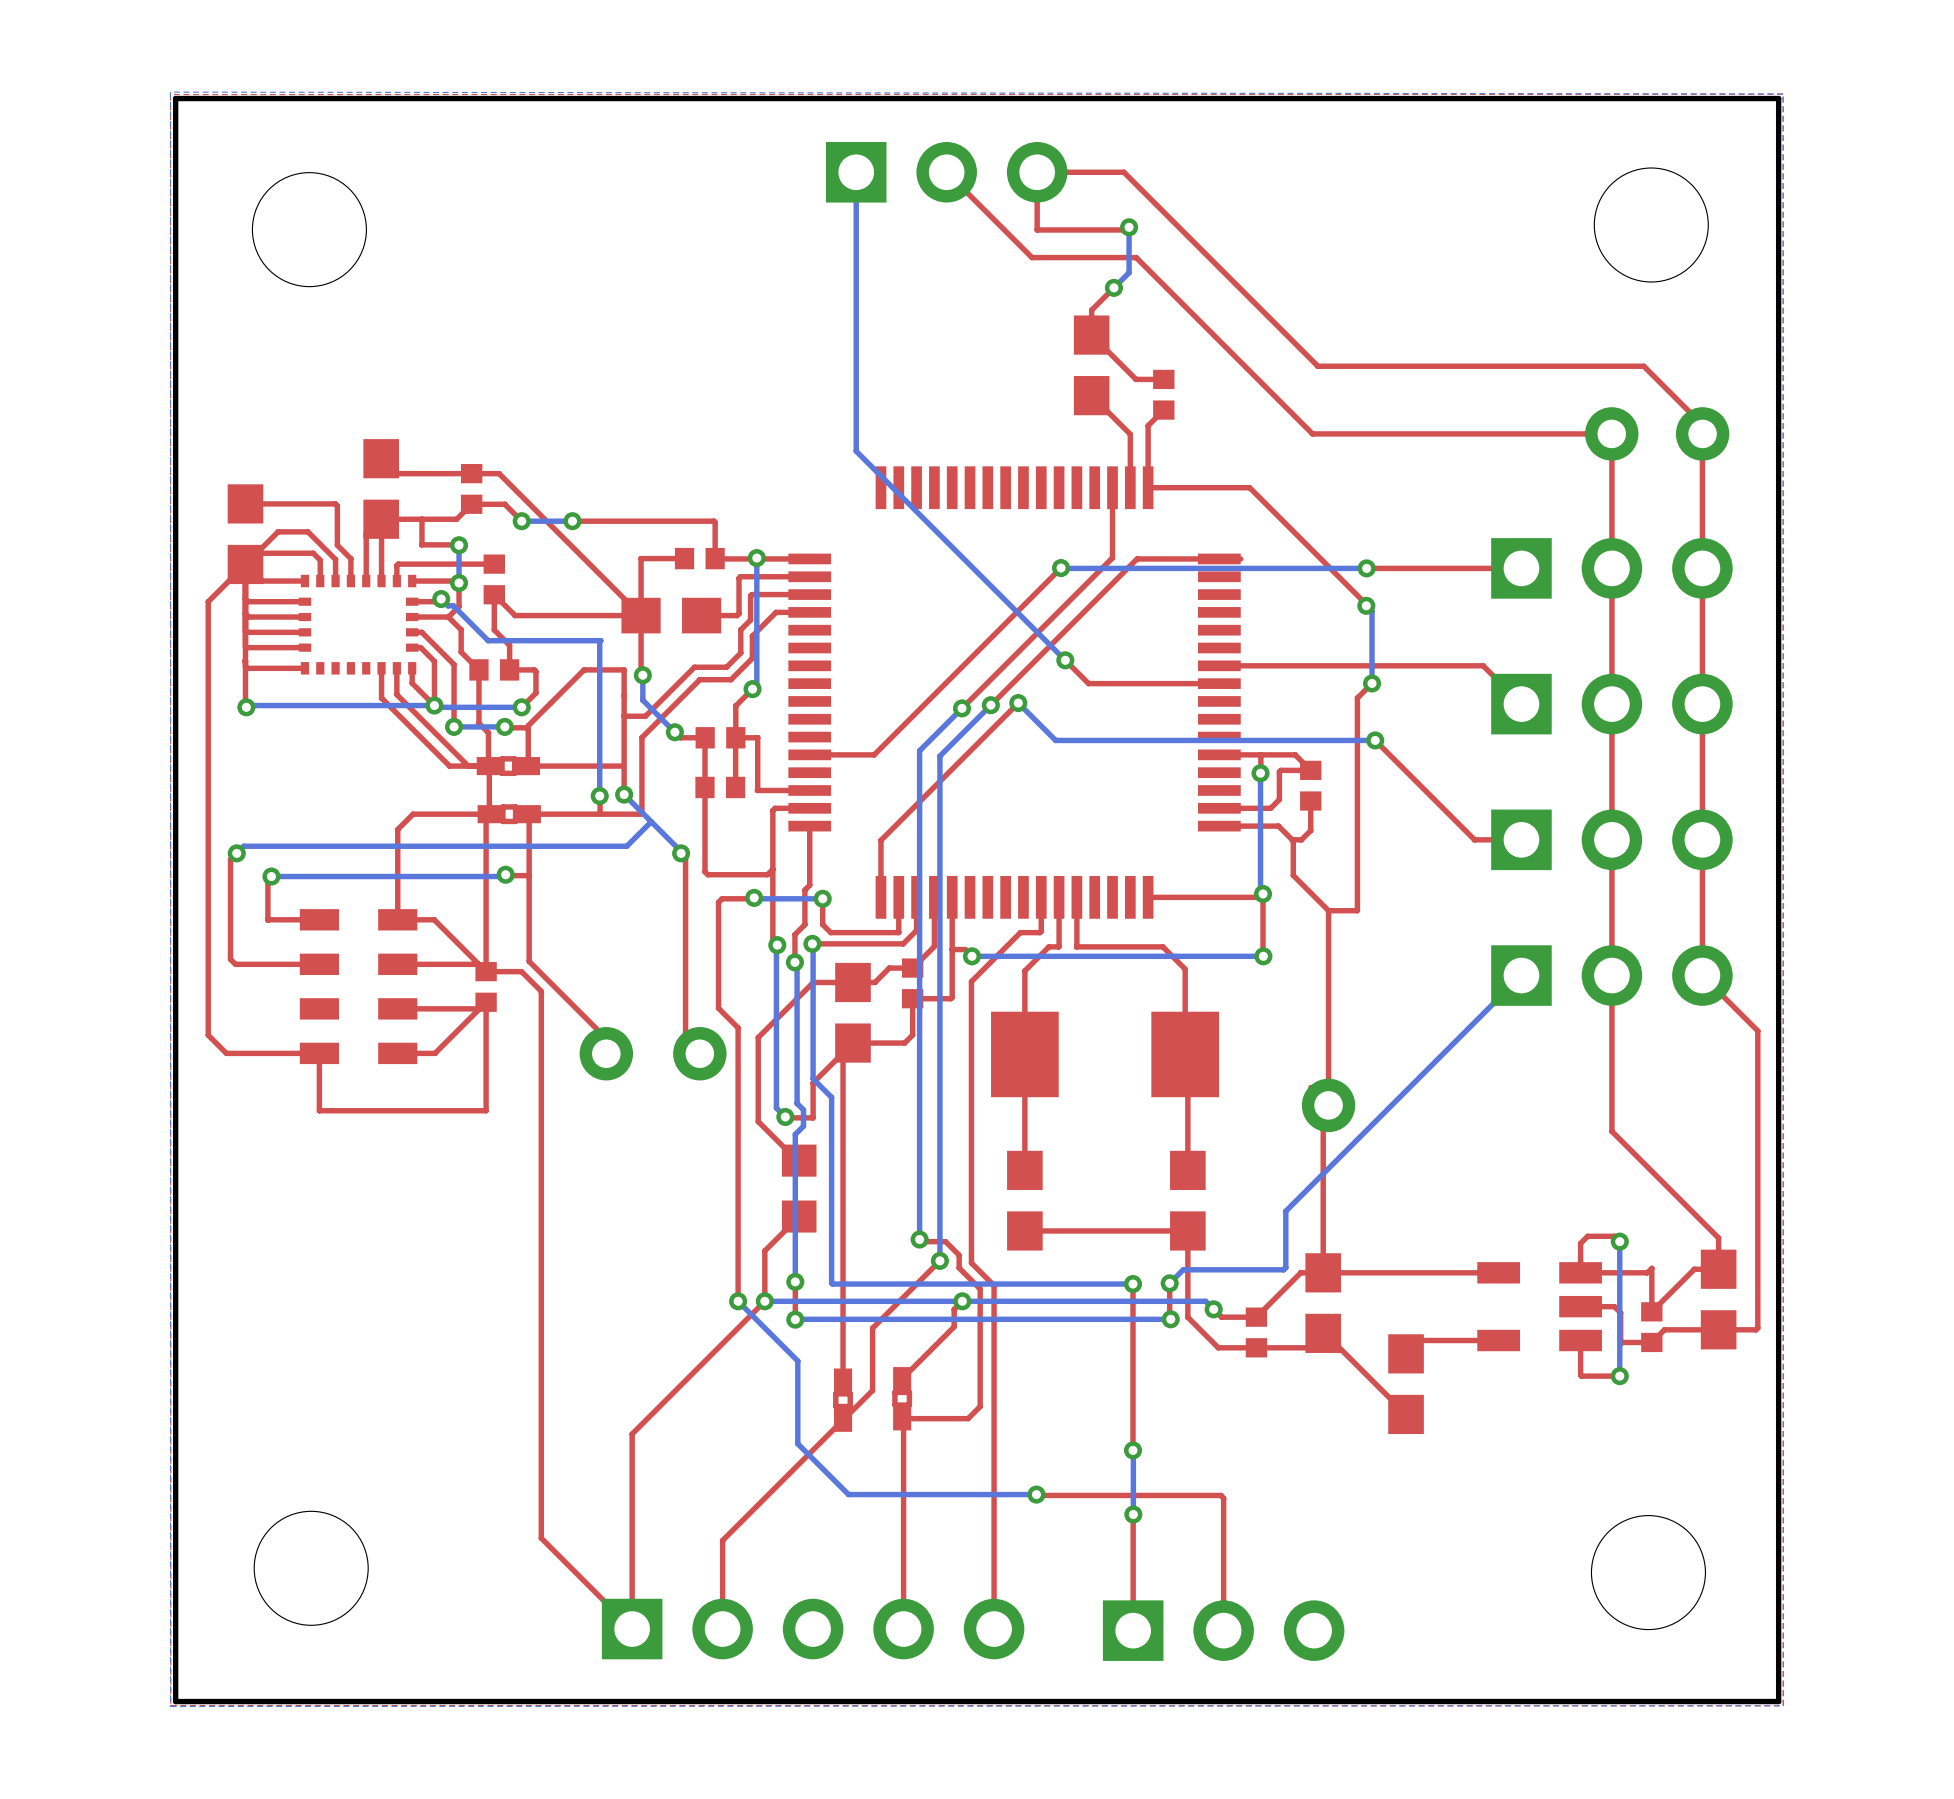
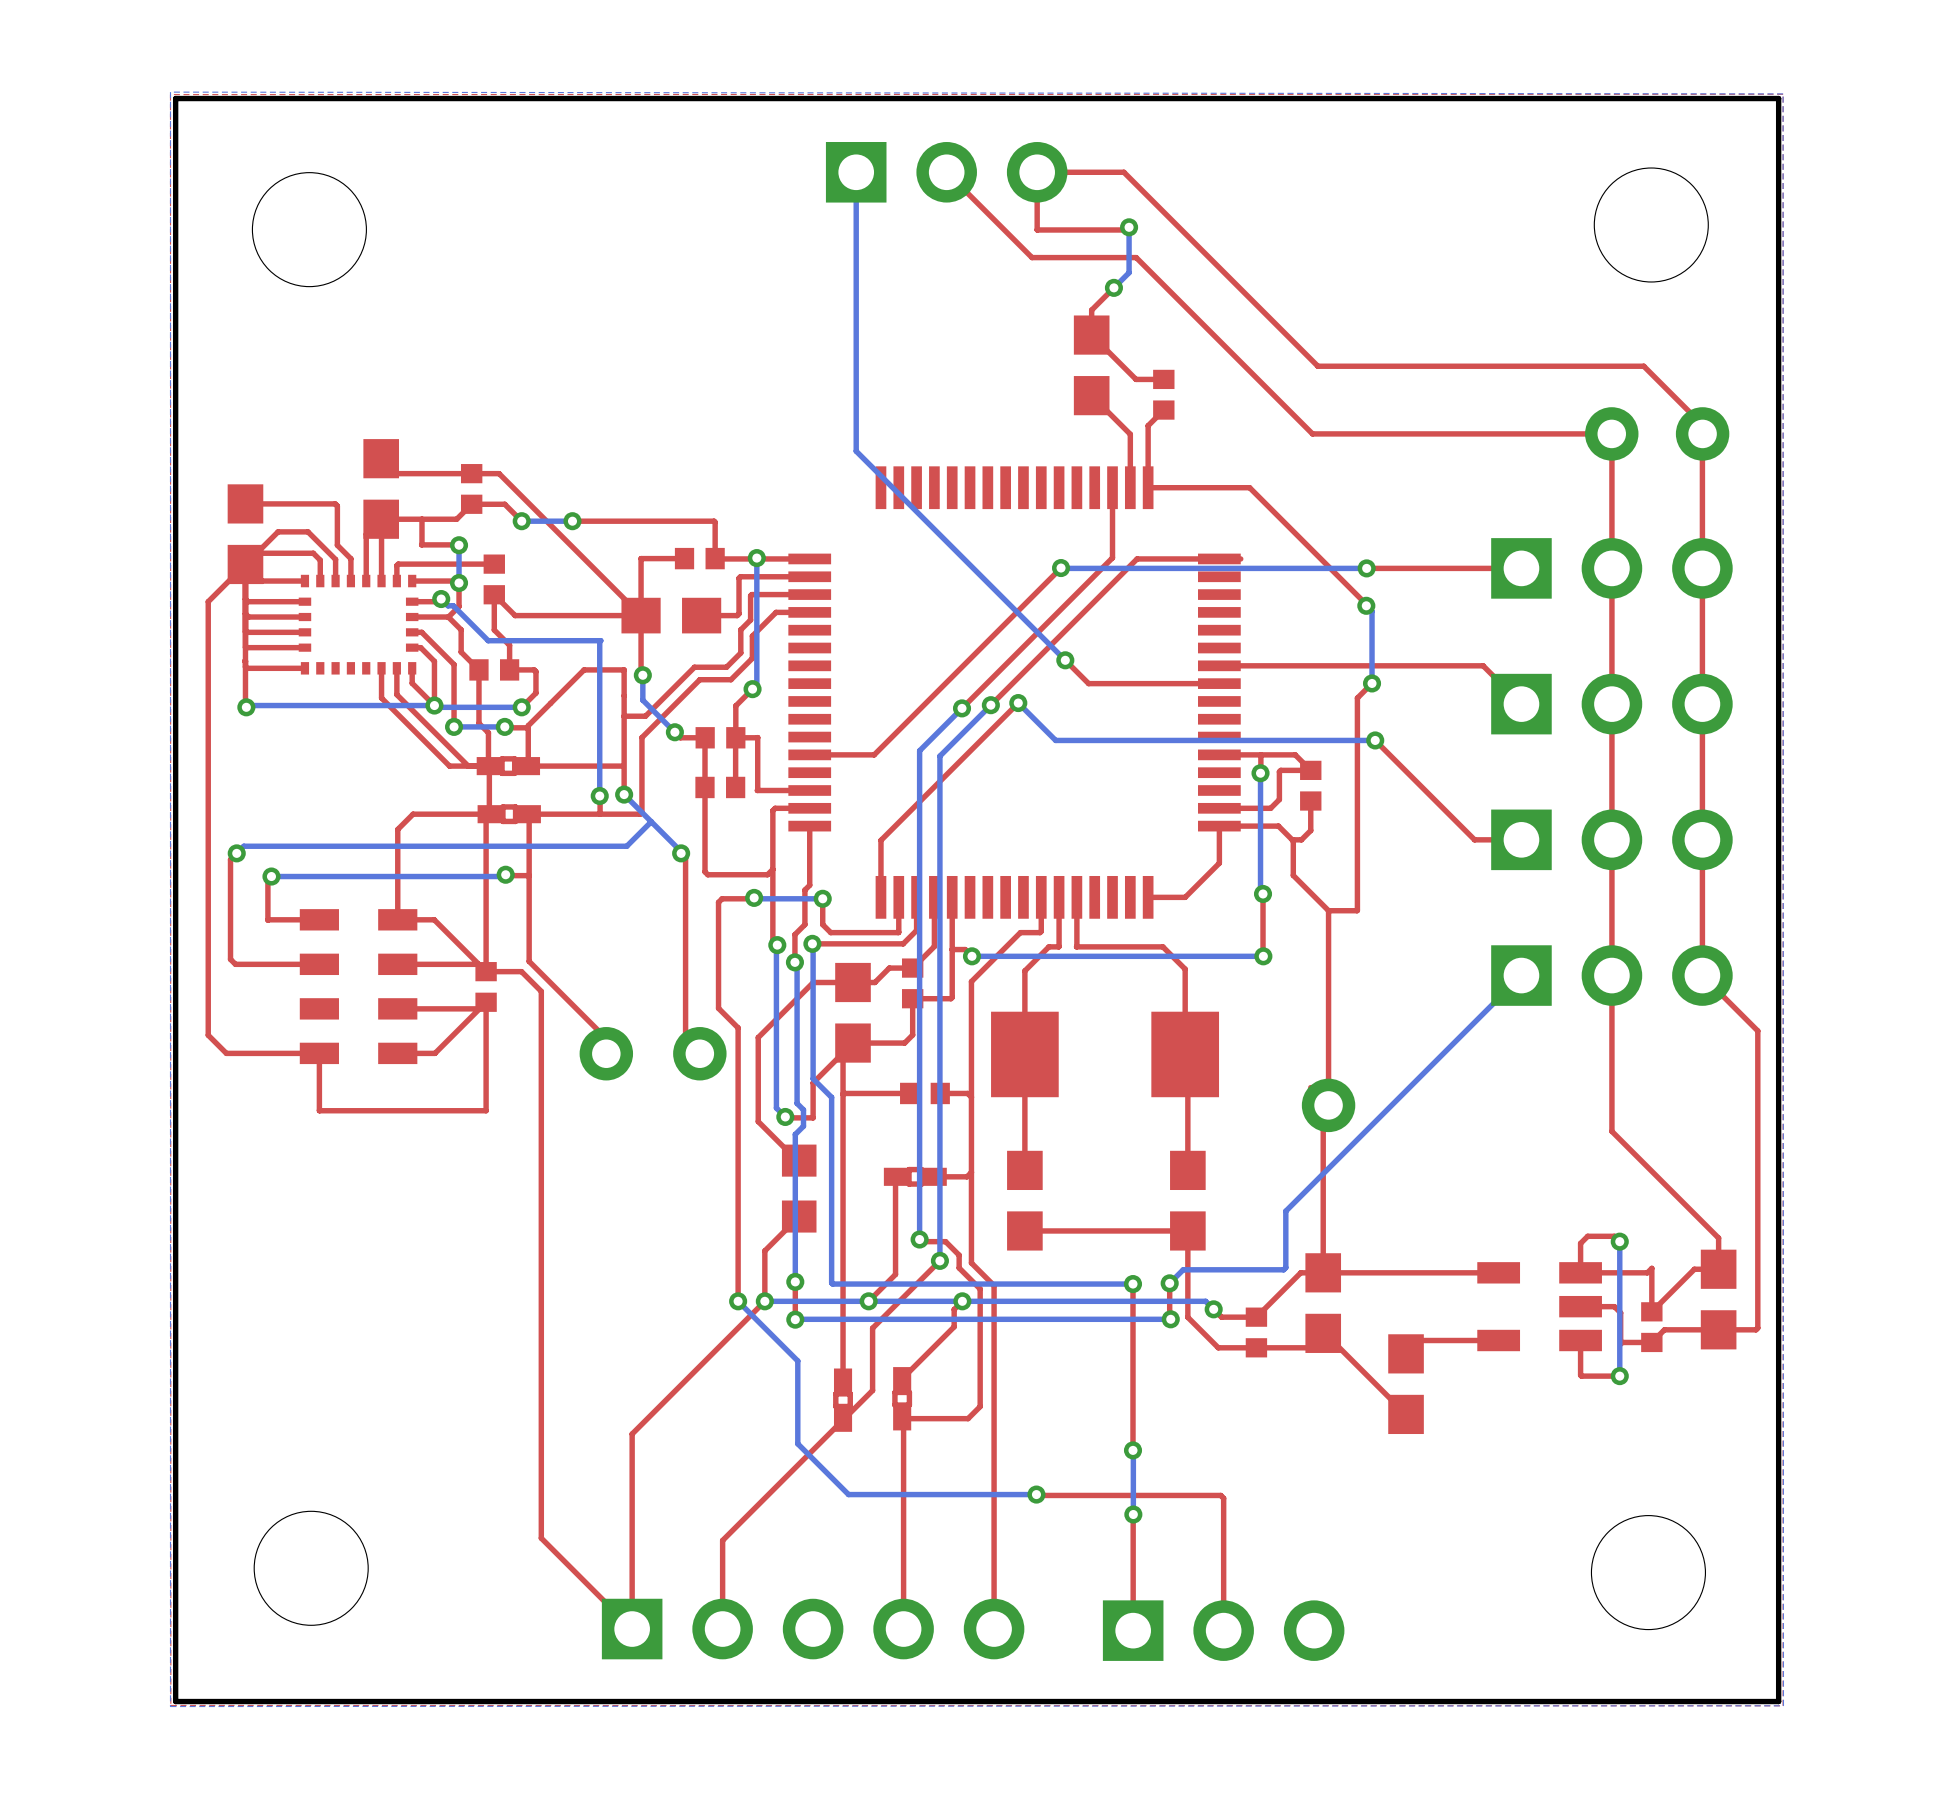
top track: (1263, 893) (1259, 897) (1185, 897) -> (1219, 826) (1219, 863) (1185, 897)
top track: none -> (909, 1093) (843, 1094)
part: none -> (924, 1093)
top track: none -> (940, 1093) (967, 1093) (971, 1097)
top track: none -> (971, 1172) (967, 1176) (935, 1176)
top track: none -> (895, 1176) (895, 1274) (868, 1301)
part: none -> (915, 1176)
via: none -> (868, 1301)

